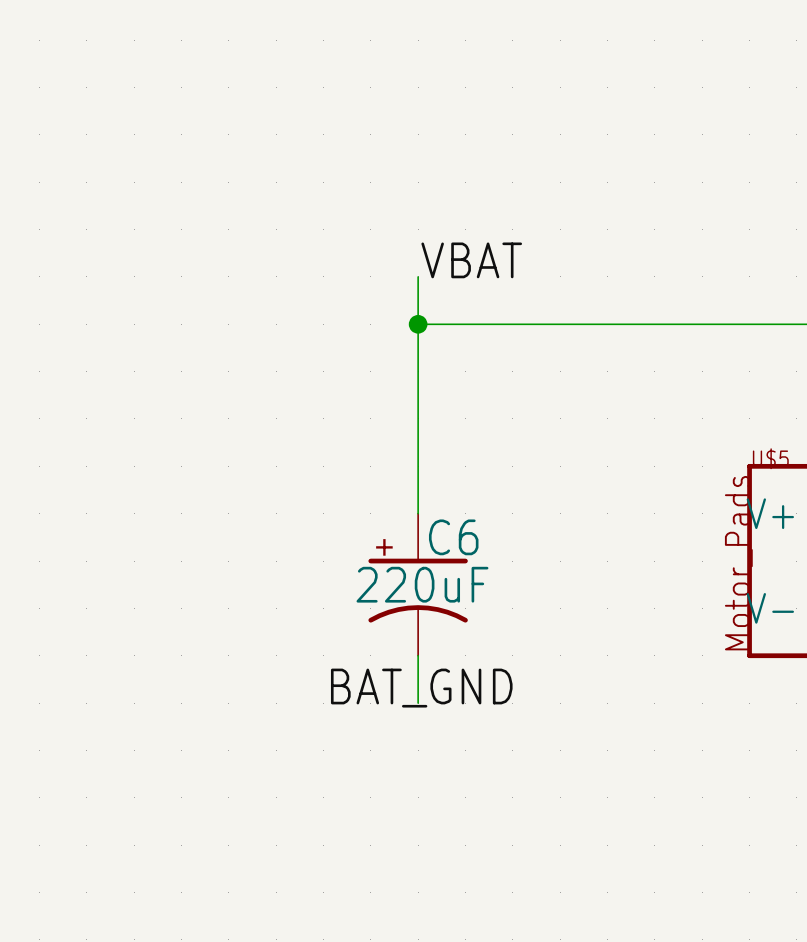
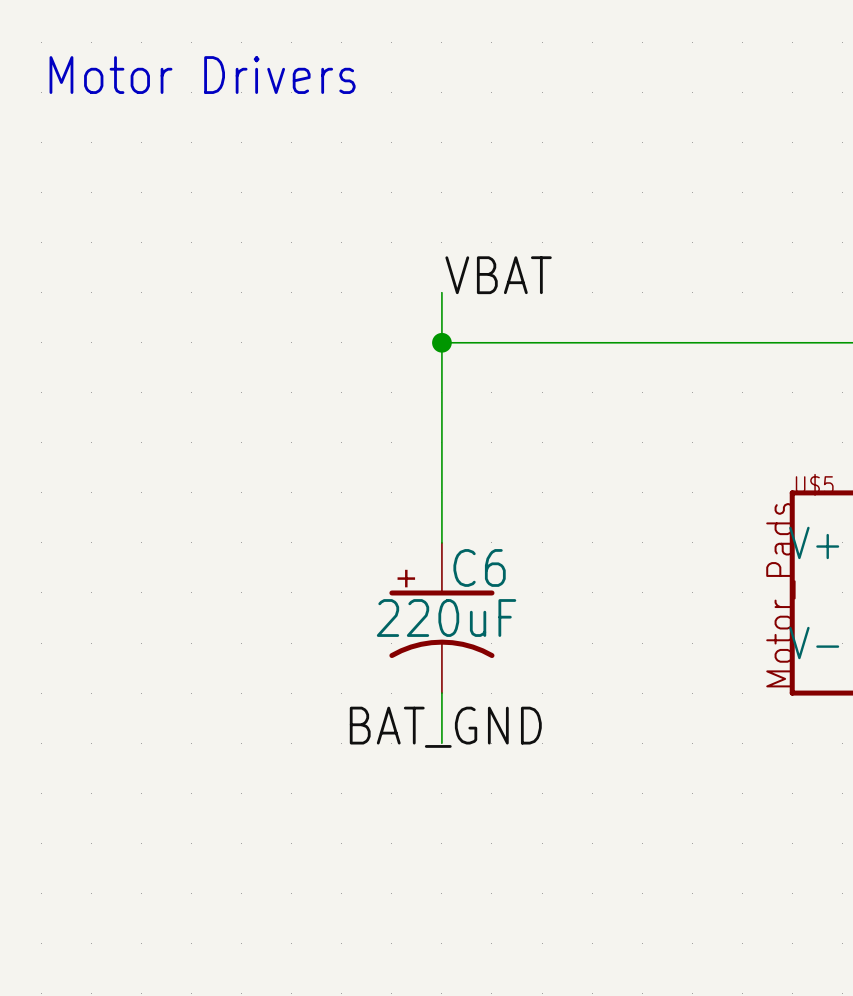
text: none -> Motor Drivers (202, 75)

